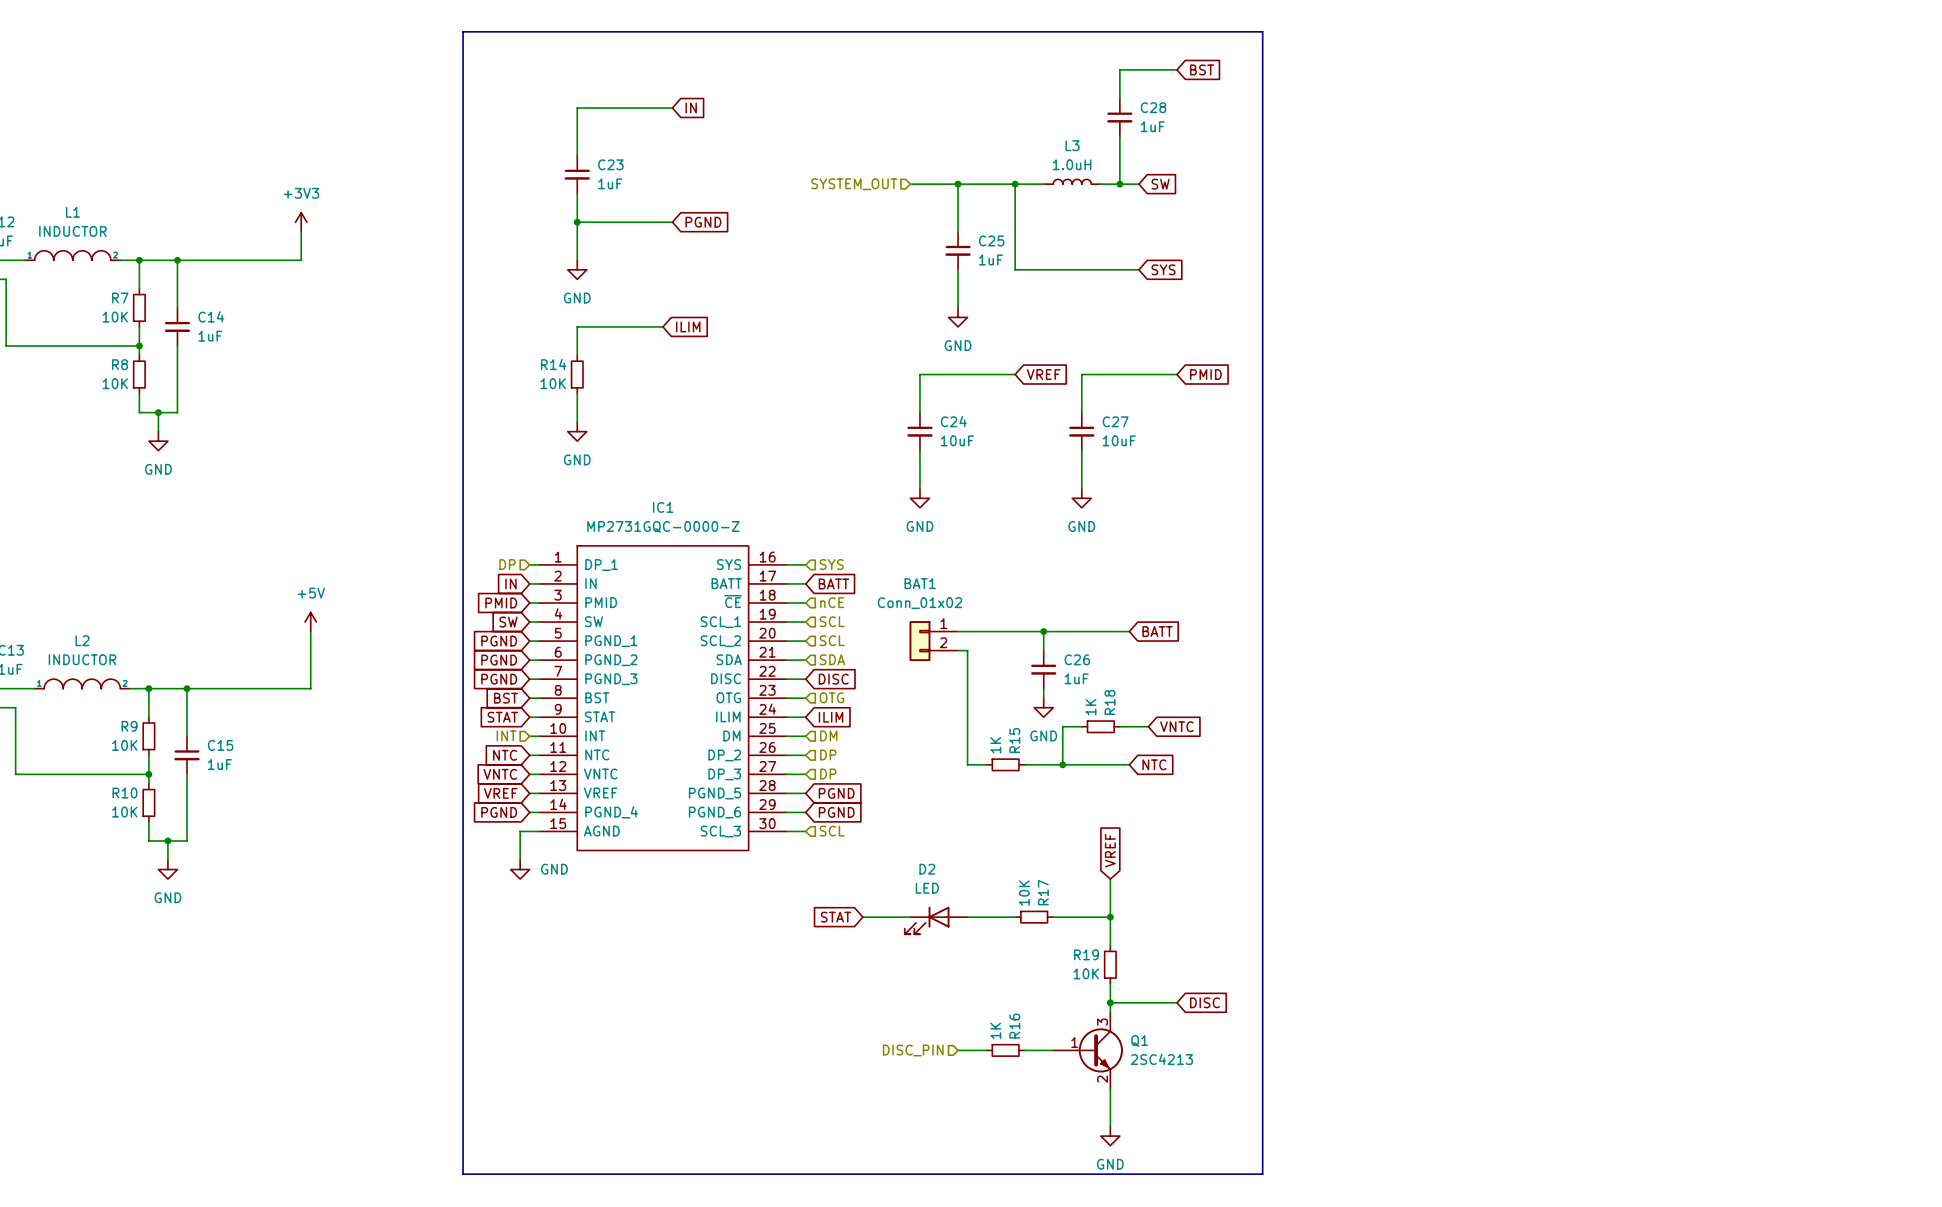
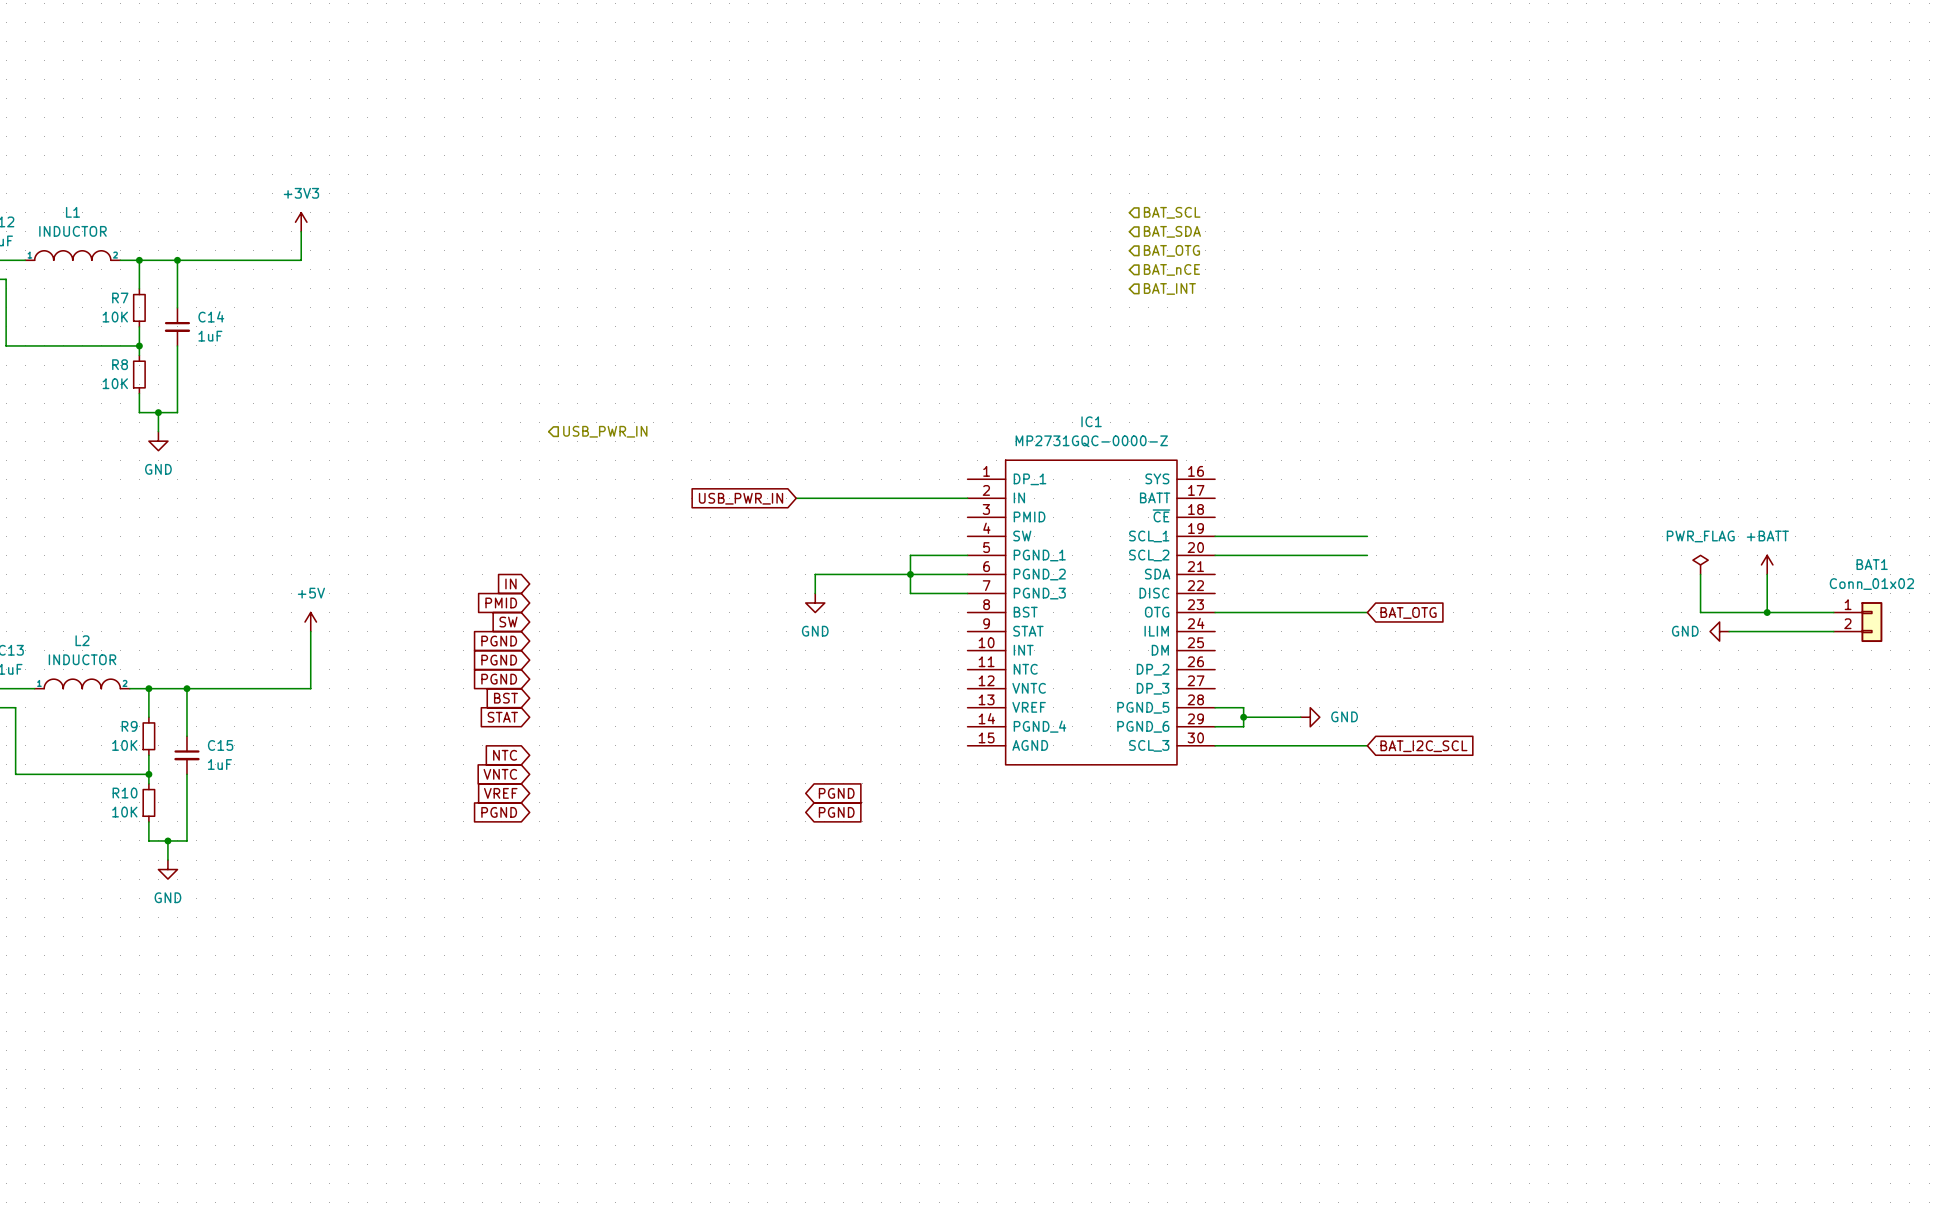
line: (463, 31) (463, 1174) (1262, 1174) (1262, 31) (463, 31) -> none
wire: (1176, 69) (1119, 69) (1119, 98) -> none
global label: BST (1202, 69) -> none
wire: (672, 107) (577, 107) (577, 155) -> none
global label: IN (691, 107) -> none
C28: 1uF (1119, 117) -> none
wire: (1119, 136) (1119, 184) -> none
C23: 1uF (577, 174) -> none
L3: 1.0uH (1072, 181) -> none
hierarchical label: SYSTEM_OUT (854, 184) -> none
wire: (910, 184) (1043, 184) -> none
wire: (958, 184) (958, 231) -> none
junction: (958, 184) -> none
wire: (1015, 184) (1015, 269) (1138, 269) -> none
junction: (1015, 184) -> none
wire: (1100, 184) (1138, 184) -> none
junction: (1119, 184) -> none
global label: SW (1160, 184) -> none
wire: (577, 193) (577, 260) -> none
hierarchical label: none -> BAT_SCL (1172, 212)
wire: (577, 222) (672, 222) -> none
junction: (577, 222) -> none
global label: PGND (703, 222) -> none
hierarchical label: none -> BAT_SDA (1172, 231)
C25: 1uF (958, 250) -> none
hierarchical label: none -> BAT_OTG (1171, 250)
power symbol: GND (577, 269) -> none
wire: (958, 269) (958, 307) -> none
global label: SYS (1163, 269) -> none
hierarchical label: none -> BAT_nCE (1171, 269)
hierarchical label: none -> BAT_INT (1169, 288)
power symbol: GND (958, 317) -> none
wire: (662, 326) (577, 326) (577, 355) -> none
global label: ILIM (688, 326) -> none
R14: 10K (577, 374) -> none
wire: (1015, 374) (919, 374) (919, 412) -> none
global label: VREF (1043, 374) -> none
wire: (1176, 374) (1081, 374) (1081, 412) -> none
global label: PMID (1205, 374) -> none
wire: (577, 393) (577, 422) -> none
power symbol: GND (577, 431) -> none
hierarchical label: none -> USB_PWR_IN (605, 431)
C24: 10uF (919, 431) -> none
C27: 10uF (1081, 431) -> none
wire: (919, 450) (919, 488) -> none
wire: (1081, 450) (1081, 488) -> none
global label: none -> USB_PWR_IN (741, 498)
wire: none -> (796, 498) (967, 498)
power symbol: GND (919, 498) -> none
power symbol: GND (1081, 498) -> none
wire: none -> (1215, 536) (1367, 536)
wire: none -> (967, 555) (910, 555) (910, 593) (967, 593)
wire: none -> (1215, 555) (1367, 555)
hierarchical label: DP (507, 564) -> none
wire: (529, 564) (539, 564) -> none
wire: (786, 564) (805, 564) -> none
hierarchical label: SYS (831, 564) -> none
power symbol: none -> PWR_FLAG (1700, 564)
power symbol: none -> +BATT (1767, 564)
junction: none -> (910, 574)
wire: none -> (967, 574) (815, 574) (815, 593)
wire: none -> (1700, 574) (1700, 612) (1833, 612)
wire: none -> (1767, 574) (1767, 612)
wire: (529, 583) (539, 583) -> none
wire: (786, 583) (805, 583) -> none
global label: BATT (833, 583) -> none
hierarchical label: nCE (832, 602) -> none
wire: (529, 603) (539, 603) -> none
wire: (786, 603) (805, 603) -> none
power symbol: none -> GND (815, 603)
wire: none -> (1215, 612) (1367, 612)
global label: none -> BAT_OTG (1408, 612)
junction: none -> (1767, 612)
hierarchical label: SCL (832, 621) -> none
wire: (529, 622) (539, 622) -> none
wire: (786, 622) (805, 622) -> none
wire: (958, 631) (1129, 631) -> none
wire: (1043, 631) (1043, 650) -> none
junction: (1043, 631) -> none
global label: BATT (1157, 631) -> none
power symbol: none -> GND (1719, 631)
wire: none -> (1729, 631) (1833, 631)
hierarchical label: SCL (832, 640) -> none
wire: (529, 641) (539, 641) -> none
wire: (786, 641) (805, 641) -> none
BAT1 flip: as is (919, 641) -> left-right (1871, 622)
BAT1 position: (933, 641) -> (1858, 622)
wire: (958, 650) (967, 650) (967, 764) (986, 764) -> none
hierarchical label: SDA (832, 659) -> none
wire: (529, 660) (539, 660) -> none
wire: (786, 660) (805, 660) -> none
C26: 1uF (1043, 669) -> none
wire: (529, 679) (539, 679) -> none
wire: (786, 679) (805, 679) -> none
global label: DISC (833, 679) -> none
wire: (1043, 688) (1043, 698) -> none
hierarchical label: OTG (831, 697) -> none
wire: (529, 698) (539, 698) -> none
IC1 position: (662, 698) -> (1091, 612)
wire: (786, 698) (805, 698) -> none
power symbol: GND (1043, 707) -> none
wire: none -> (1215, 707) (1243, 707) (1243, 726) (1215, 726)
wire: (529, 717) (539, 717) -> none
wire: (786, 717) (805, 717) -> none
global label: ILIM (831, 717) -> none
wire: none -> (1243, 717) (1300, 717)
junction: none -> (1243, 717)
power symbol: none -> GND (1310, 717)
wire: (1081, 726) (1062, 726) (1062, 764) -> none
R18: 1K (1100, 726) -> none
wire: (1119, 726) (1148, 726) -> none
global label: VNTC (1176, 726) -> none
hierarchical label: INT (506, 735) -> none
hierarchical label: DM (828, 735) -> none
wire: (529, 736) (539, 736) -> none
wire: (786, 736) (805, 736) -> none
wire: none -> (1215, 745) (1367, 745)
global label: none -> BAT_I2C_SCL (1423, 746)
hierarchical label: DP (828, 754) -> none
wire: (529, 755) (539, 755) -> none
wire: (786, 755) (805, 755) -> none
R15: 1K (1005, 764) -> none
junction: (1062, 764) -> none
global label: NTC (1154, 764) -> none
hierarchical label: DP (828, 773) -> none
wire: (529, 774) (539, 774) -> none
wire: (786, 774) (805, 774) -> none
wire: (529, 793) (539, 793) -> none
wire: (786, 793) (805, 793) -> none
wire: (529, 812) (539, 812) -> none
wire: (786, 812) (805, 812) -> none
wire: (539, 831) (520, 831) (520, 860) -> none
wire: (786, 831) (805, 831) -> none
hierarchical label: SCL (832, 831) -> none
global label: VREF (1110, 850) -> none
power symbol: GND (520, 869) -> none
wire: (1110, 879) (1110, 945) -> none
global label: STAT (835, 917) -> none
wire: (862, 917) (910, 917) -> none
wire: (967, 917) (1015, 917) -> none
R17: 10K (1034, 917) -> none
wire: (1053, 917) (1110, 917) -> none
junction: (1110, 917) -> none
D2: LED (936, 920) -> none
R19: 10K (1110, 964) -> none
wire: (1110, 983) (1110, 1012) -> none
wire: (1110, 1002) (1176, 1002) -> none
junction: (1110, 1002) -> none
global label: DISC (1205, 1002) -> none
hierarchical label: DISC_PIN (913, 1050) -> none
wire: (958, 1050) (986, 1050) -> none
R16: 1K (1005, 1050) -> none
wire: (1024, 1050) (1053, 1050) -> none
Q1: 2SC4213 (1088, 1050) -> none
wire: (1110, 1088) (1110, 1126) -> none
power symbol: GND (1110, 1136) -> none

